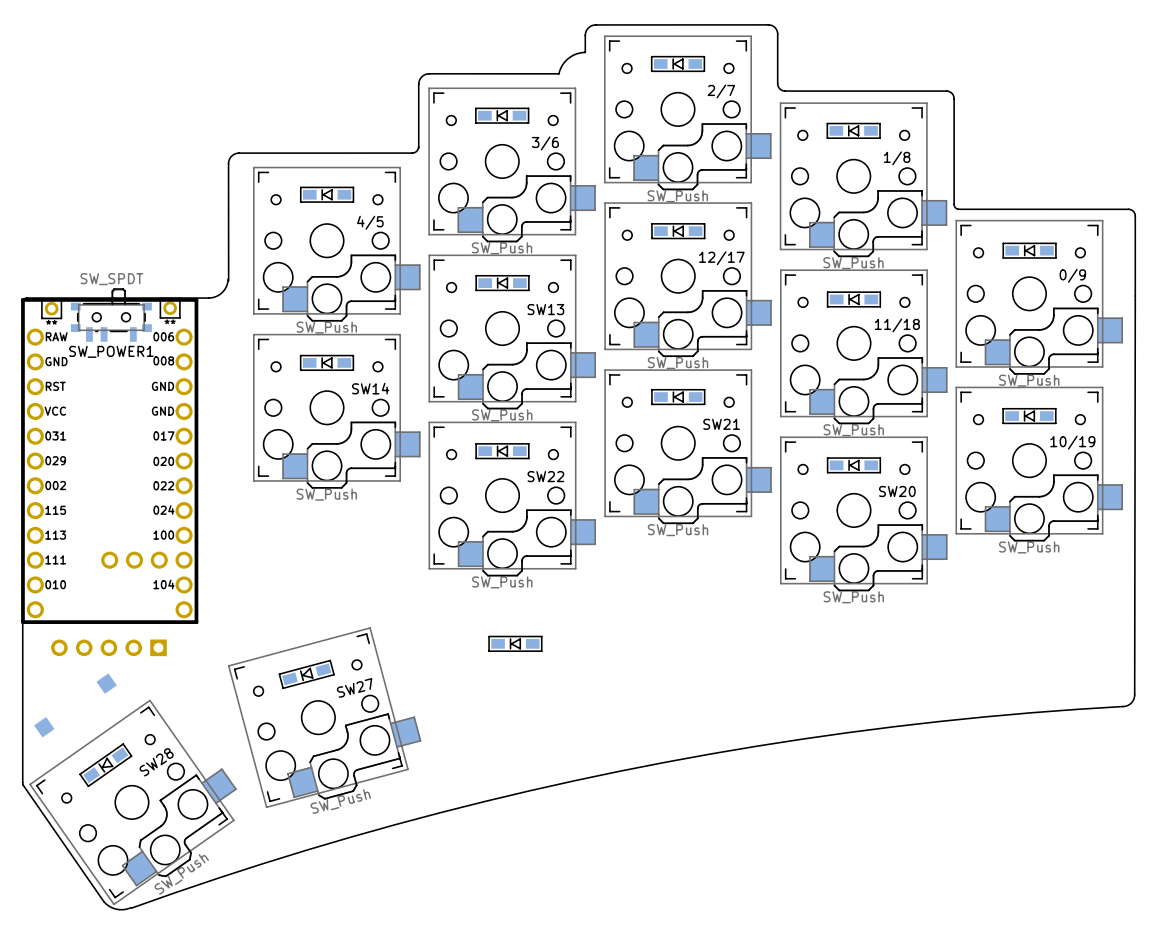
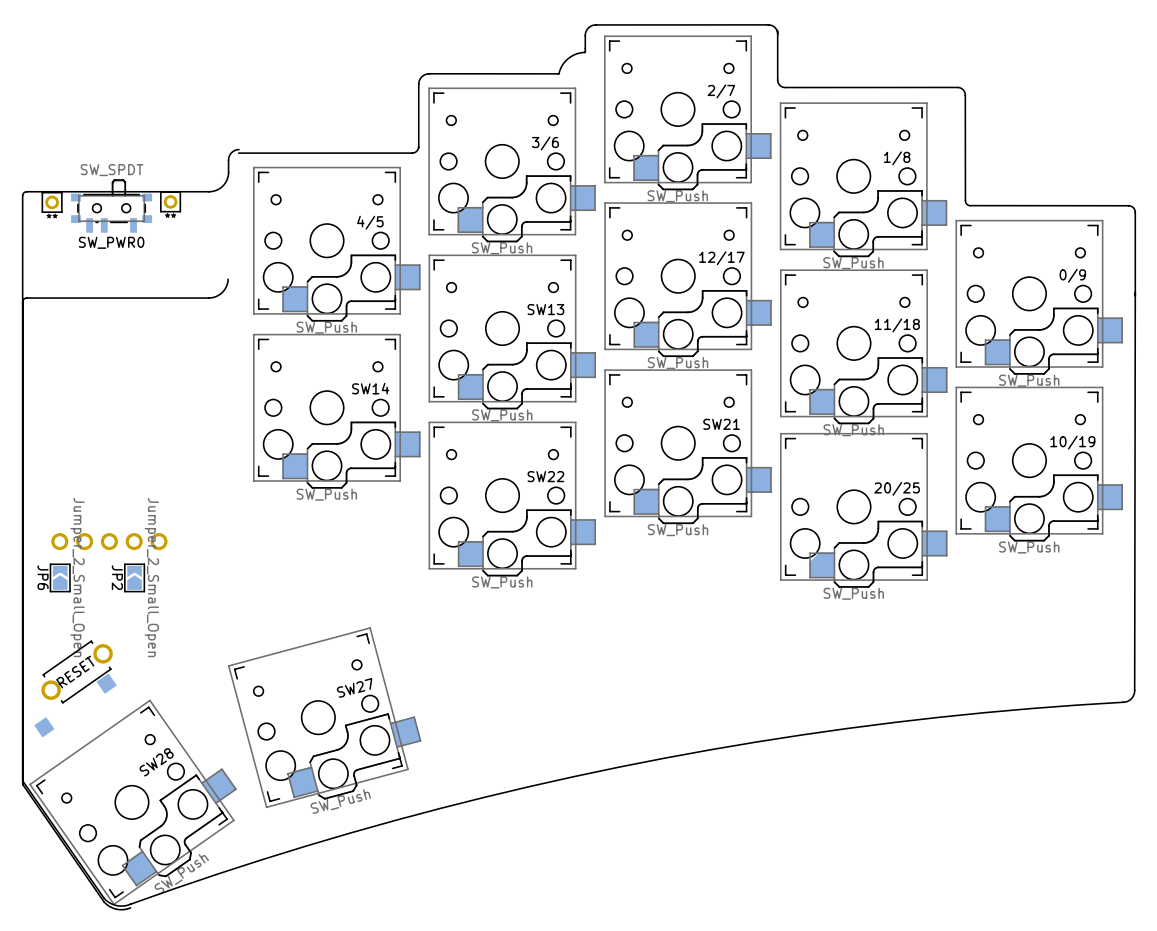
part: (678, 63) -> none
board edge: (777, 80) (778, 87) (784, 91) (946, 91) (951, 92) (954, 98) (954, 204) (957, 209) (1128, 209) (1133, 211) (1135, 216) -> (777, 80) (779, 85) (785, 87) (960, 88) (965, 95) (965, 200) (967, 204) (1129, 205) (1134, 208) (1135, 216)
part: (502, 115) -> none
part: (853, 130) -> none
board edge: (239, 153) (231, 156) (228, 162) (228, 280) -> none
part: (327, 194) -> none
part: none -> (170, 201)
part: none -> (52, 202)
SW_PWR0: none -> SW_SPDT (111, 206)
part: (678, 231) -> none
part: (1029, 250) -> none
part: (502, 283) -> none
part: (853, 299) -> none
part: (51, 308) -> none
part: (170, 308) -> none
SW_POWER1: SW_SPDT (111, 315) -> none
part: (327, 362) -> none
part: (678, 397) -> none
part: (1029, 416) -> none
part: (502, 451) -> none
part: (109, 461) -> none
part: (853, 465) -> none
20/25: none -> SW_Push (863, 510)
SW20: SW_Push (863, 513) -> none
part: none -> (109, 541)
JP6: none -> Jumper_2_Small_Open (60, 577)
JP2: none -> Jumper_2_Small_Open (134, 577)
part: (515, 643) -> none
part: (108, 647) -> none
part: none -> (77, 671)
part: (306, 674) -> none
board edge: (1134, 690) (1133, 700) (1124, 706) (984, 716) (847, 732) (710, 754) (574, 780) (440, 812) (351, 837) (262, 863) (131, 908) -> (1134, 690) (1132, 697) (1124, 702) (1030, 708) (892, 722) (755, 742) (619, 767) (484, 797) (350, 833) (217, 873) (127, 905) (119, 906) (108, 902) (22, 779) (22, 194) (26, 191) (213, 191) (225, 182) (228, 175) (229, 155) (233, 151) (239, 149)
part: (105, 765) -> none

